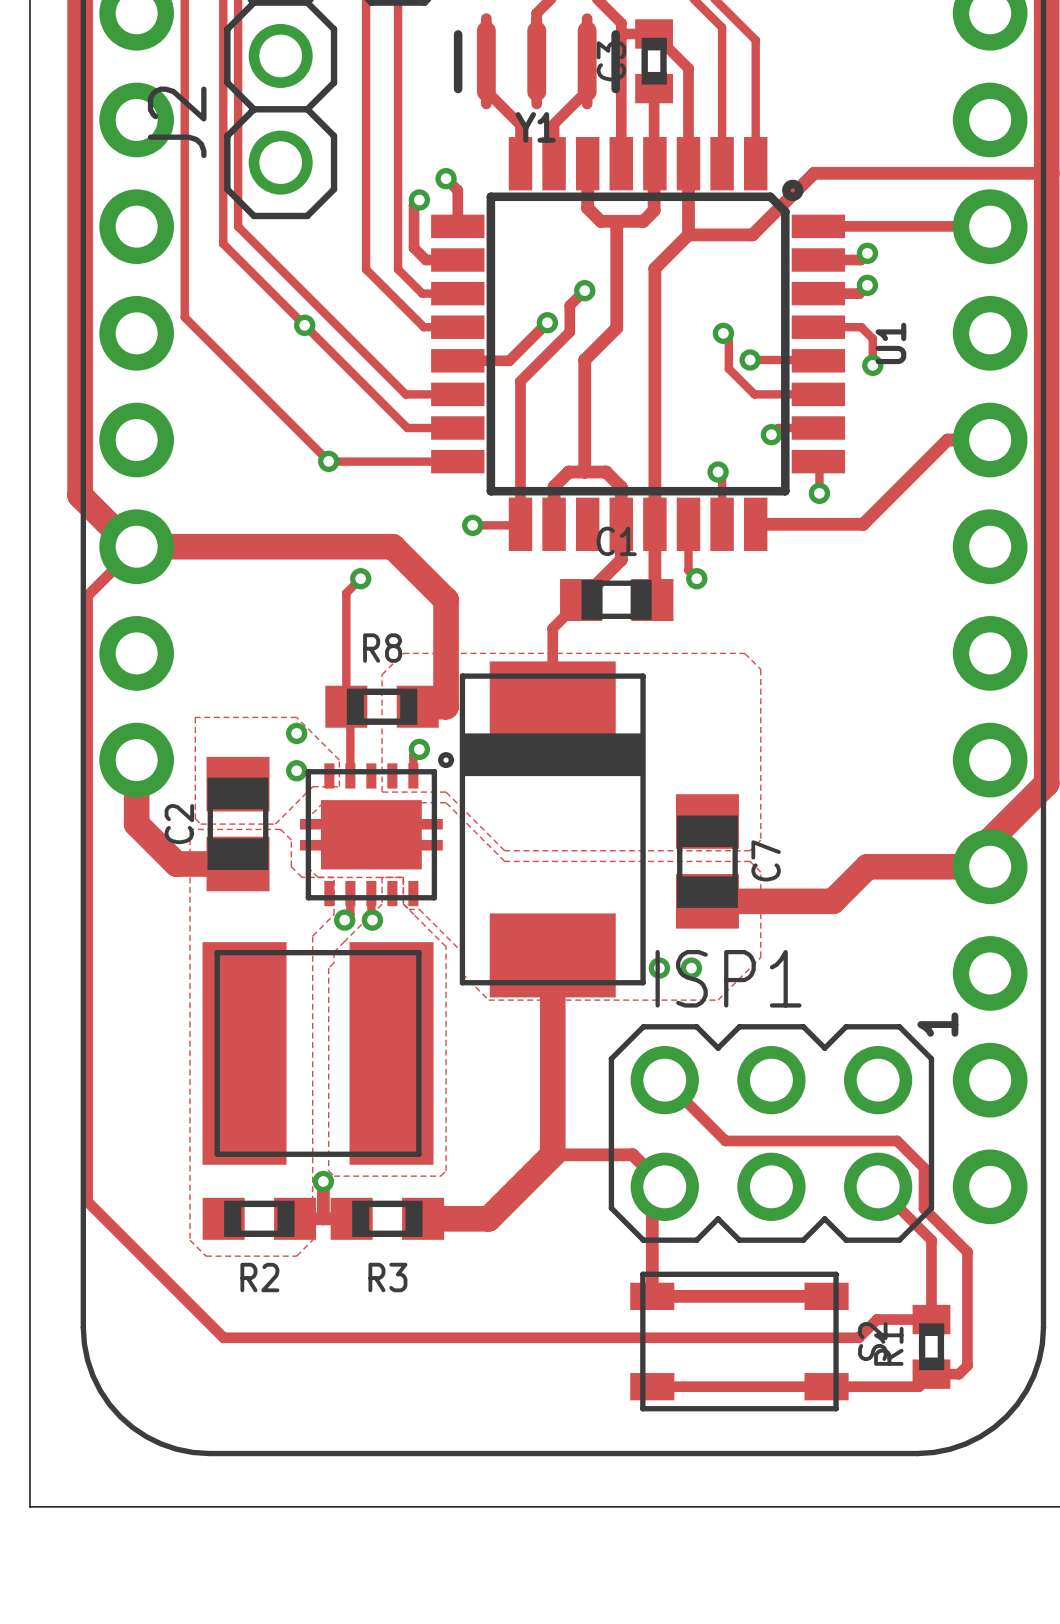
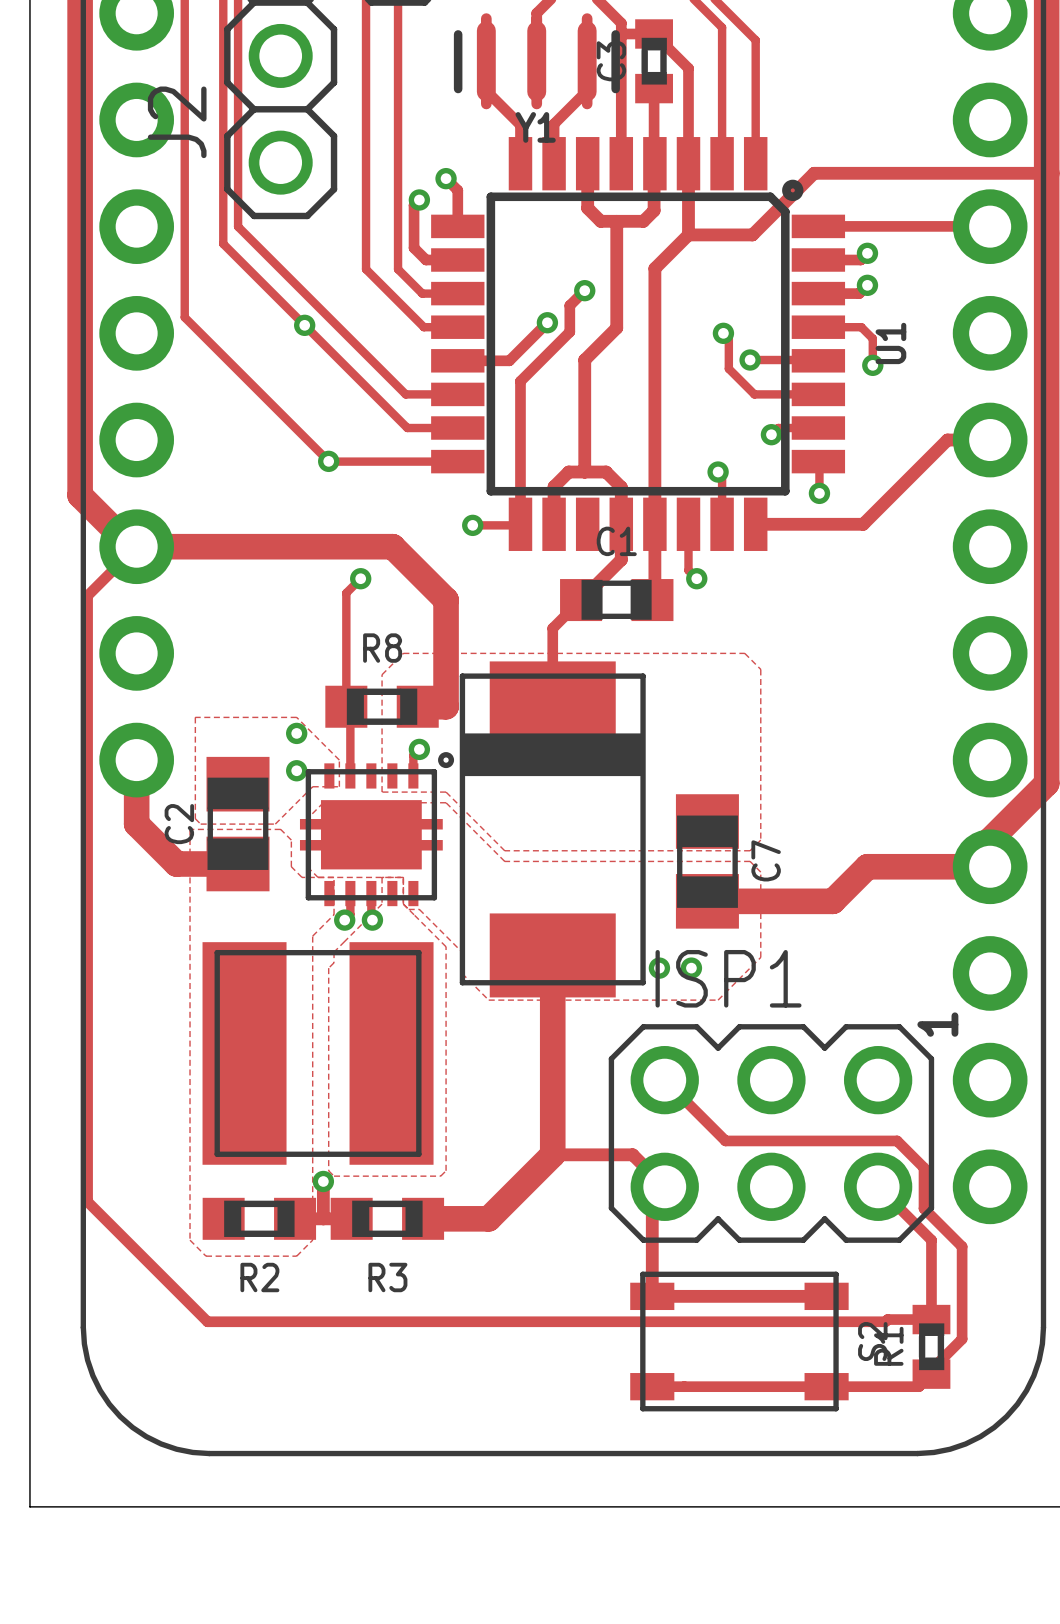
track: (962, 1246) (967, 1251) (967, 1365) (959, 1374) (931, 1374) -> (962, 1246) (962, 1339) (931, 1369) (931, 1374)
track: (887, 1319) (877, 1319) (858, 1337) (223, 1337) (207, 1321) -> (887, 1319) (885, 1321) (207, 1321)

